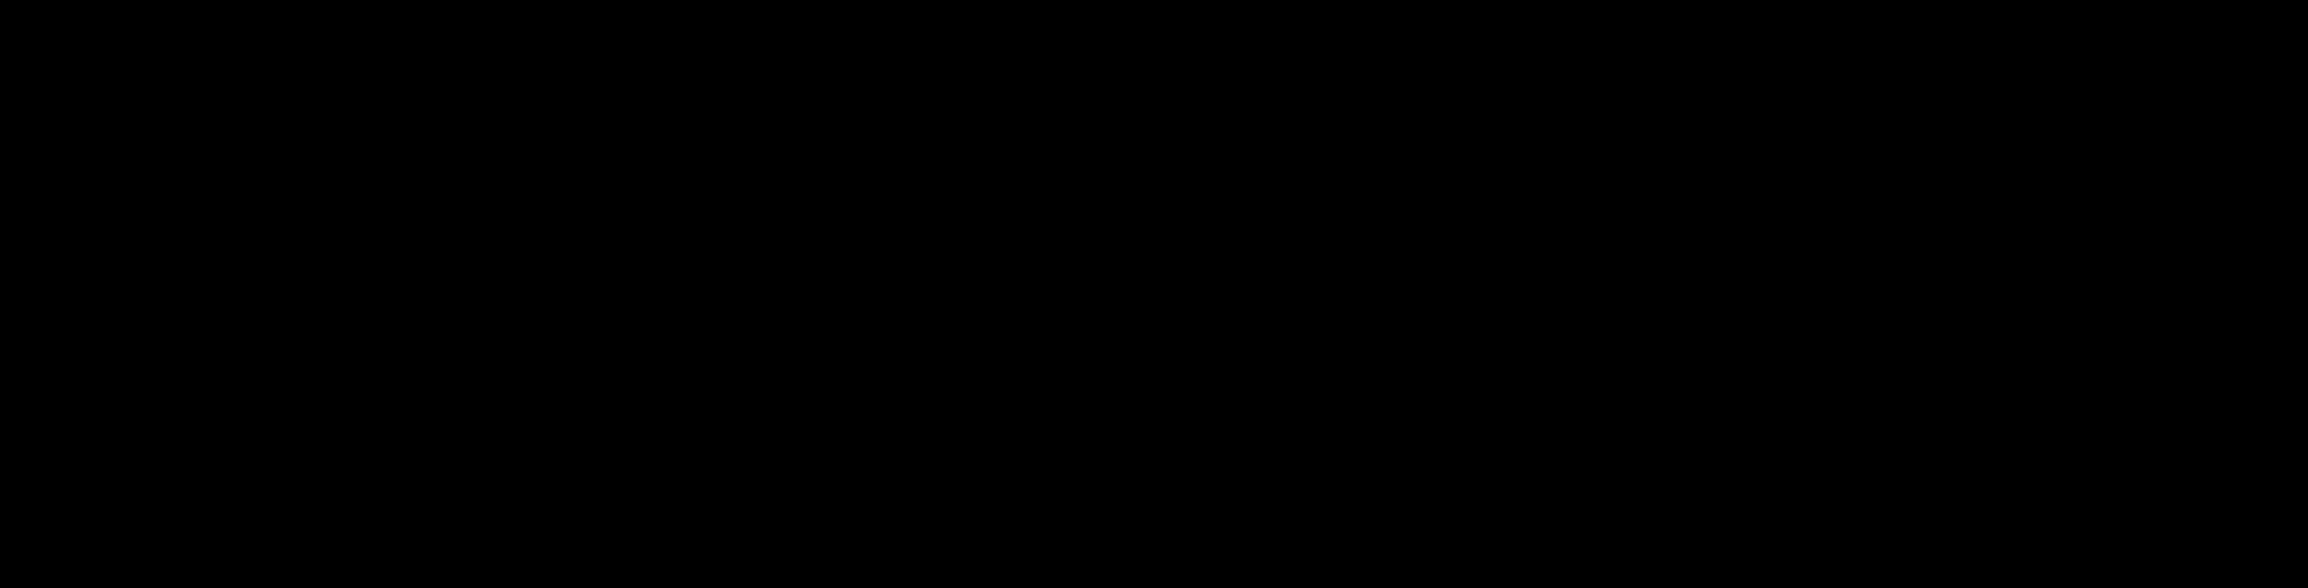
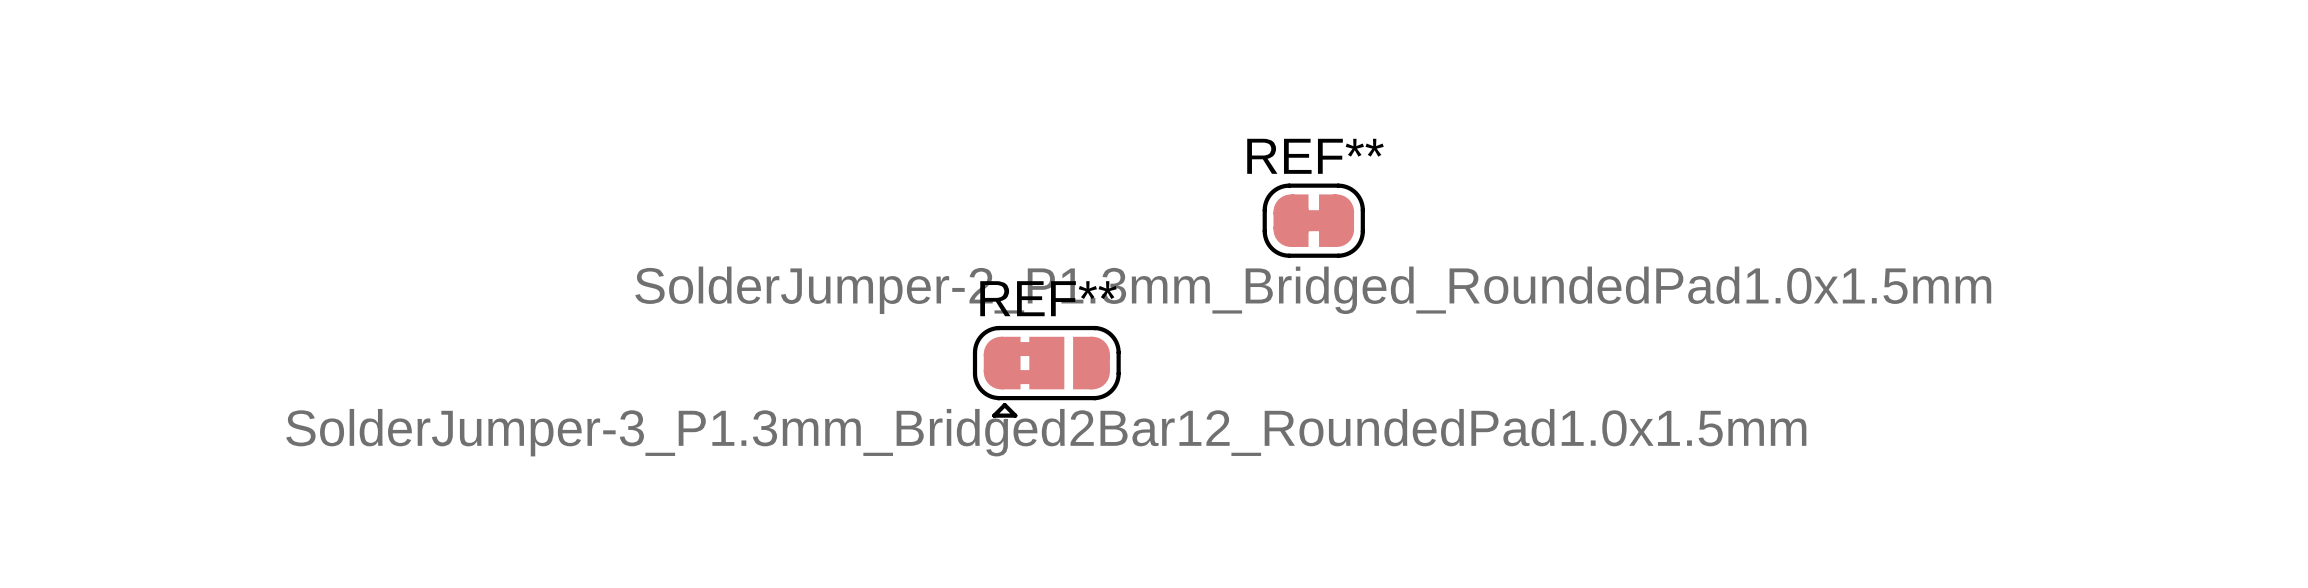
REF**: none -> SolderJumper-2_P1.3mm_Bridged_RoundedPad1.0x1.5mm (1313, 220)
REF**: none -> SolderJumper-3_P1.3mm_Bridged2Bar12_RoundedPad1.0x1.5mm (1046, 371)

